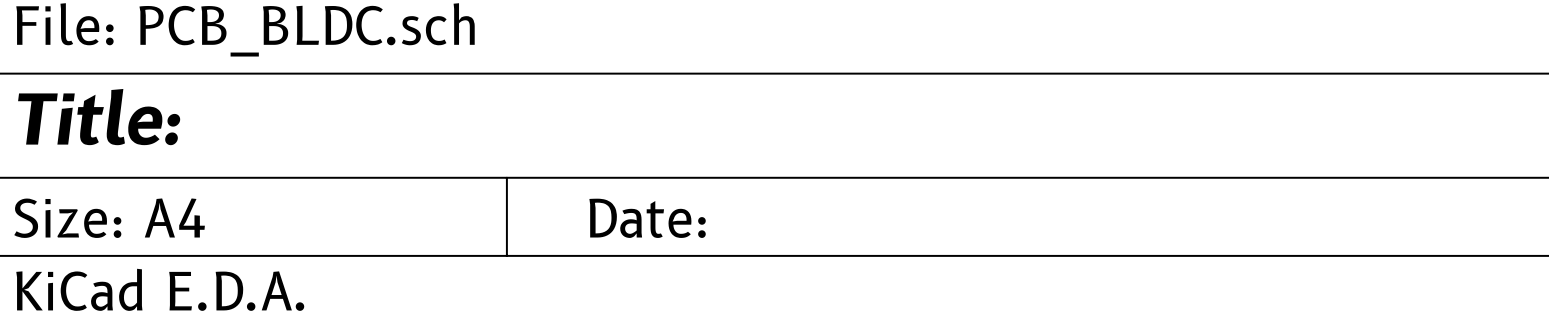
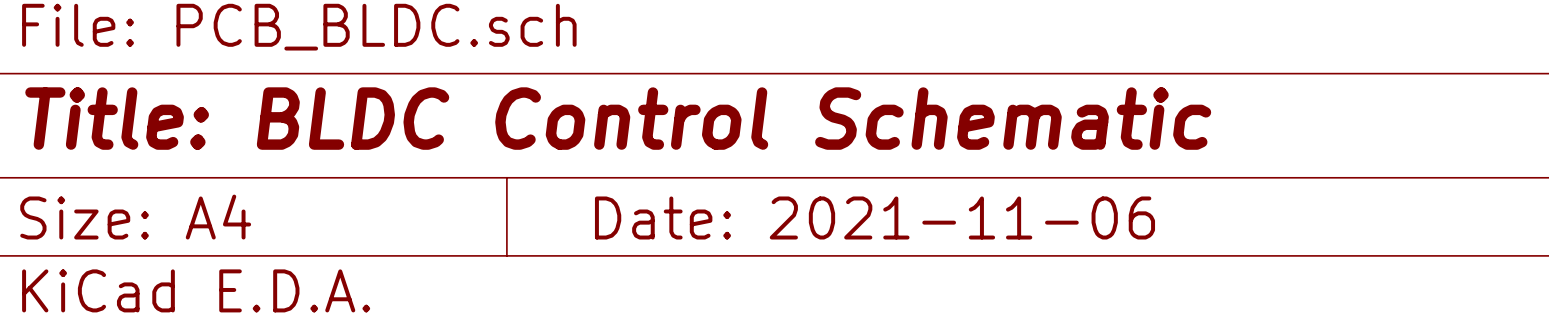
title block: Title: (99, 117) -> Title: BLDC Control Schematic (618, 118)
title block: Date: (647, 218) -> Date: 2021-11-06 (874, 217)

